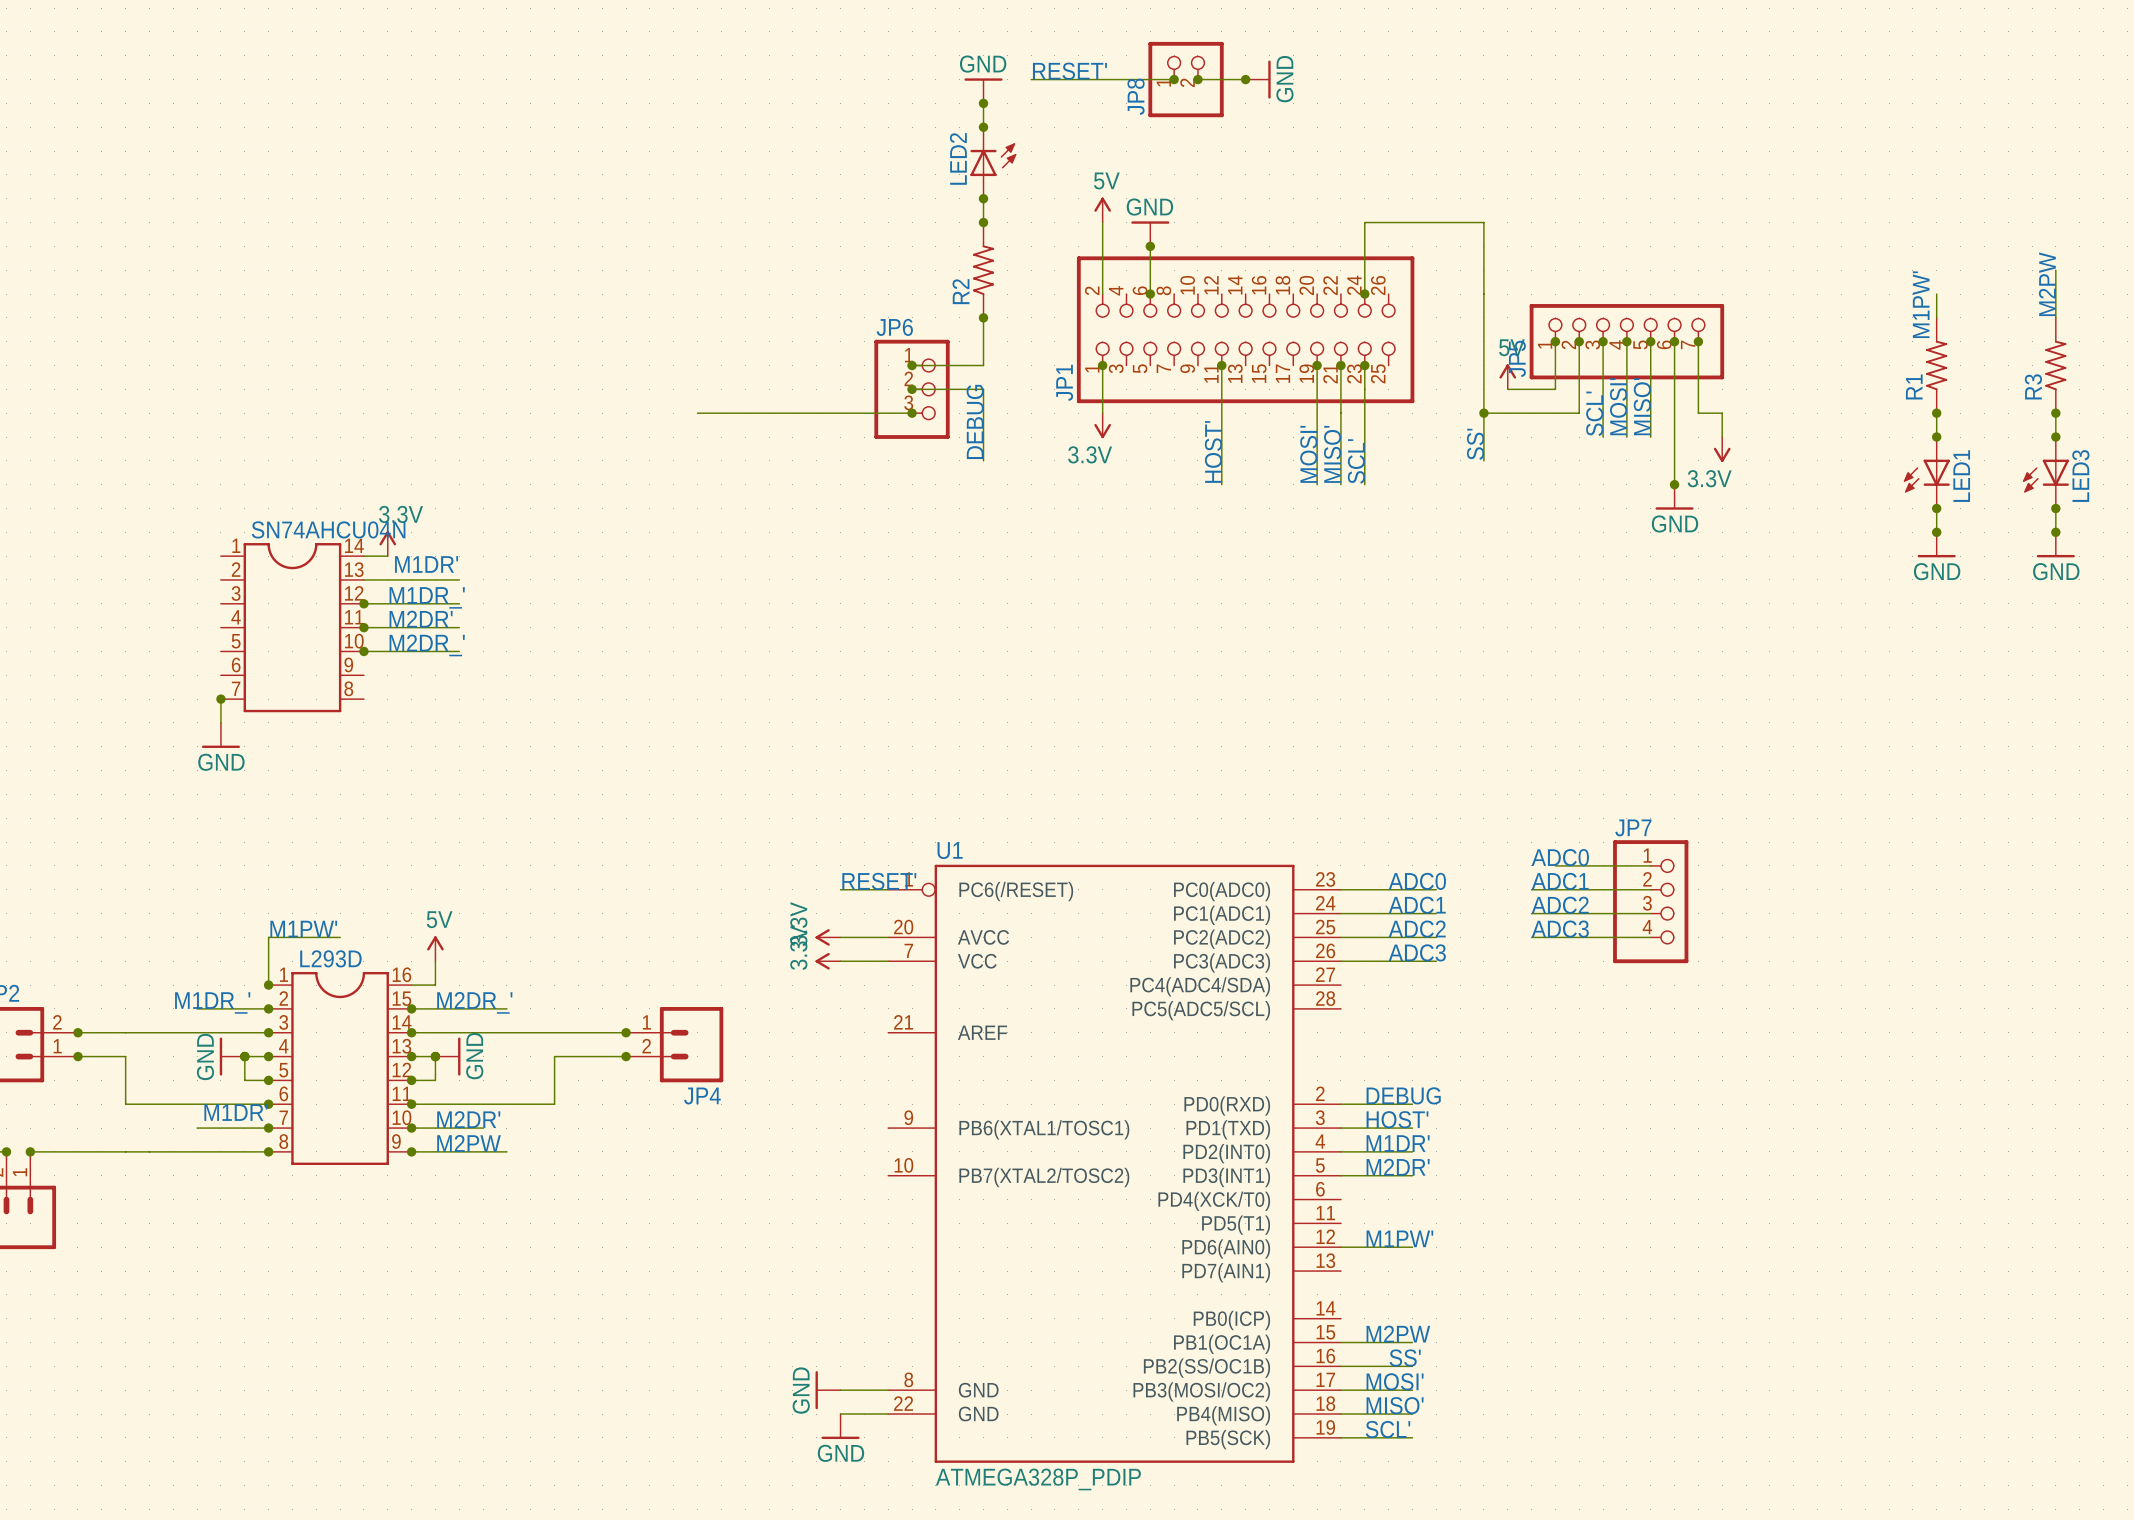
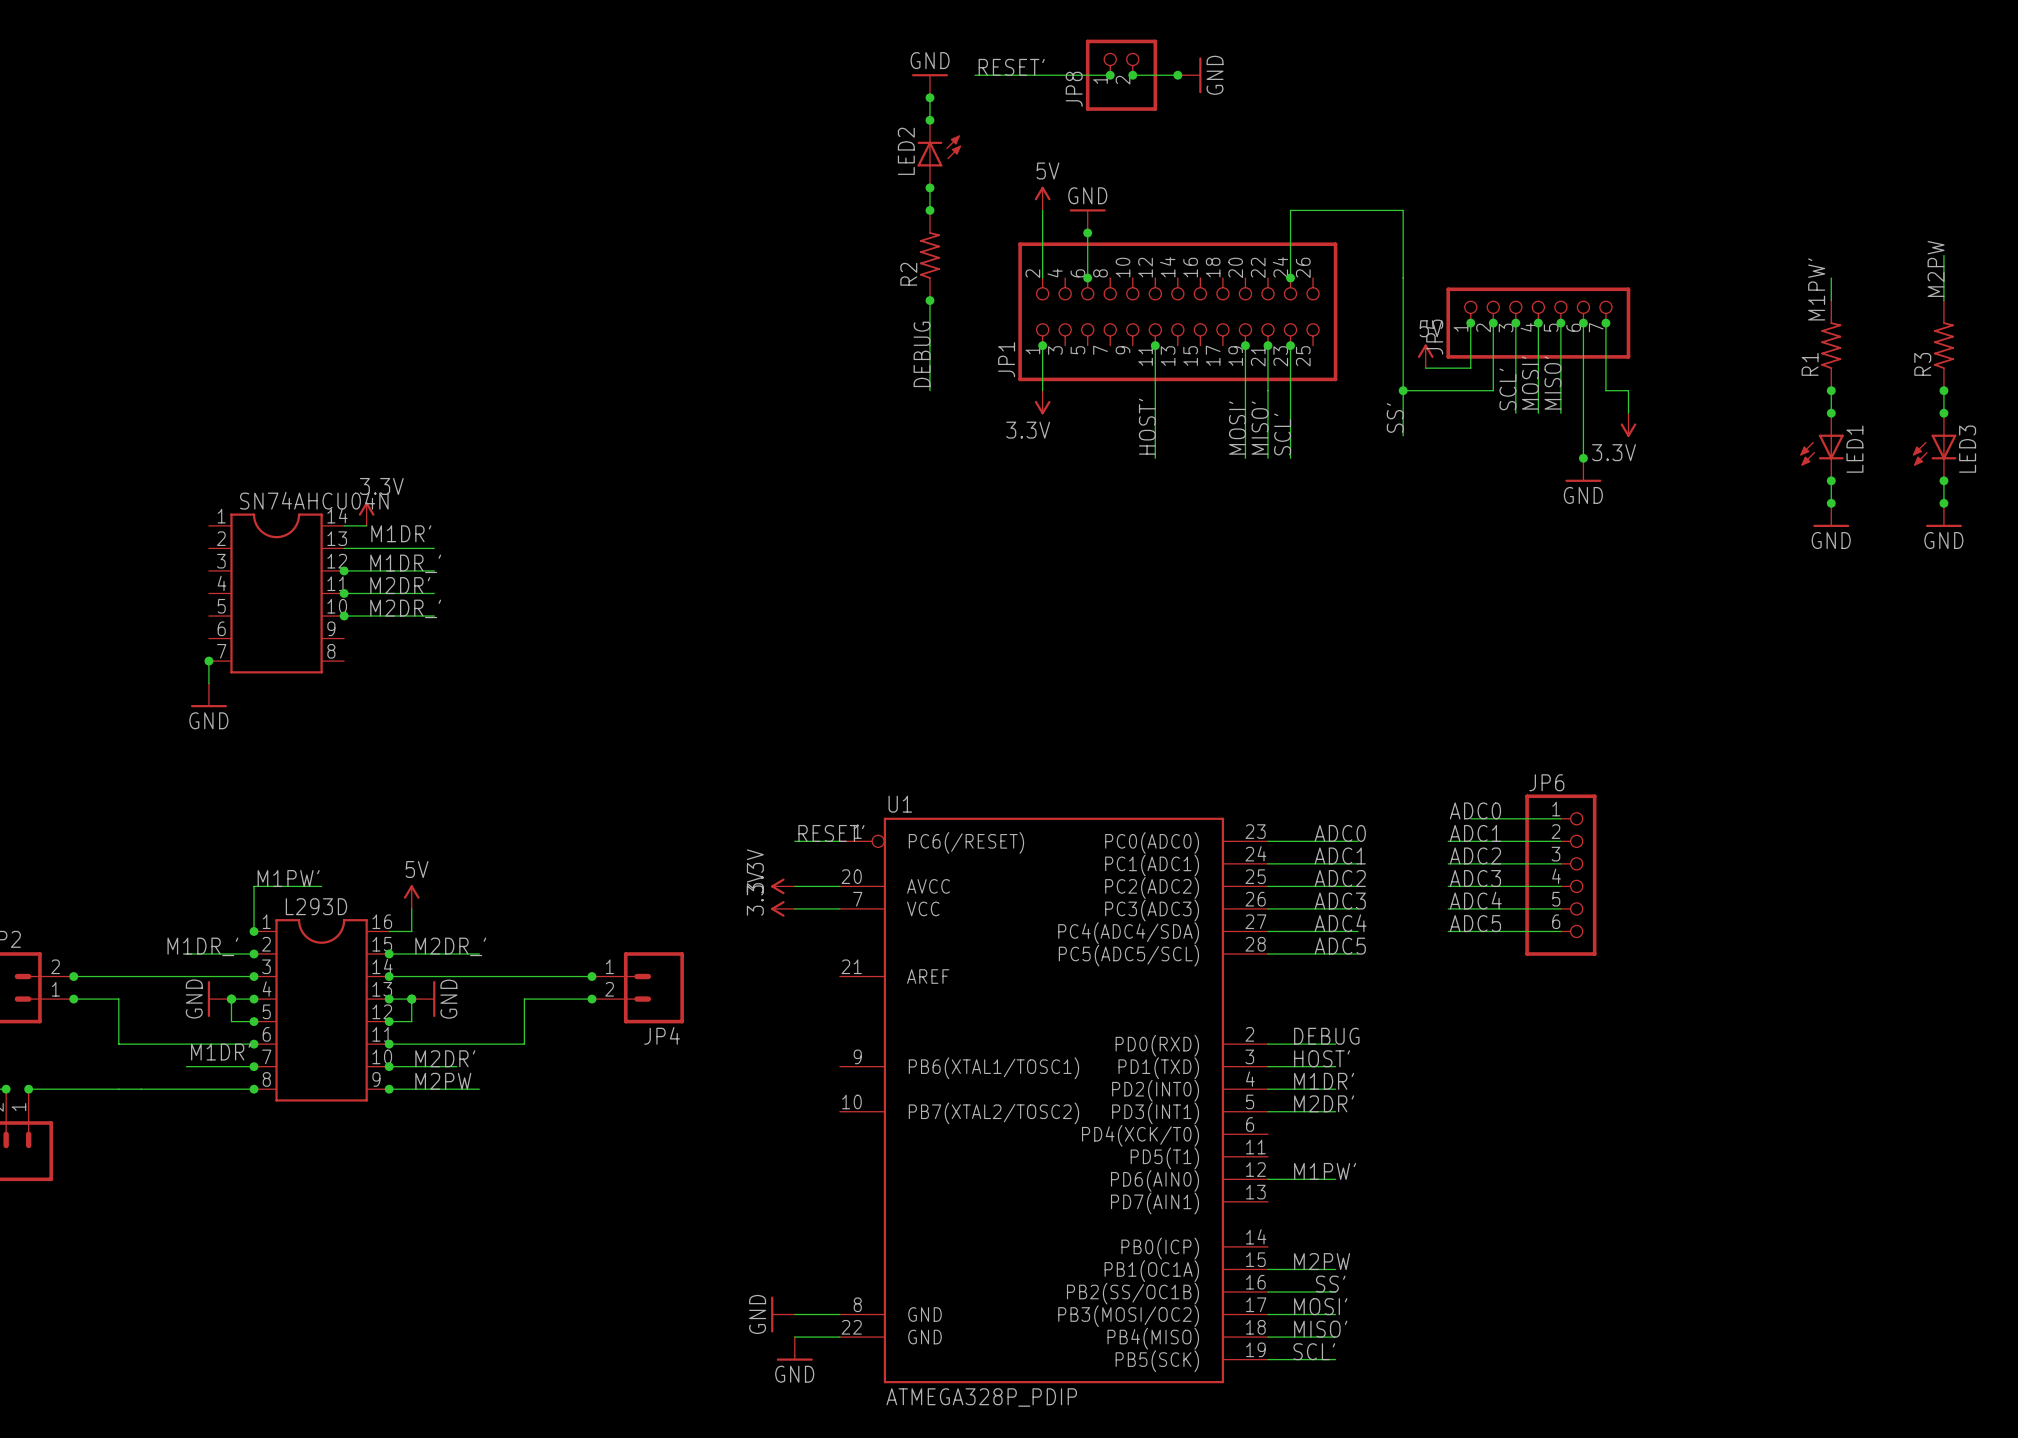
JP6 name position: JP6 (894, 327) -> JP6 (1546, 782)
JP6 symbol: [874, 339, 950, 439] -> [1525, 794, 1597, 956]
wire: (912, 365) (983, 365) -> (929, 368) (929, 345)
junction: (912, 365) -> none
wire: (912, 389) (983, 389) -> none
junction: (912, 389) -> none
wire: (697, 413) (912, 413) -> none
junction: (912, 413) -> none
wire: (983, 413) (983, 460) -> none
text position: DEBUG (975, 421) -> DEBUG (922, 354)
JP7: (1650, 901) -> none
text: none -> ADC4 (1475, 900)
wire: none -> (1448, 908) (1560, 908)
text: none -> ADC4 (1340, 923)
text: none -> ADC5 (1475, 923)
wire: none -> (1267, 931) (1358, 931)
wire: none -> (1448, 931) (1560, 931)
text: none -> ADC5 (1340, 946)
wire: none -> (1267, 954) (1358, 954)

